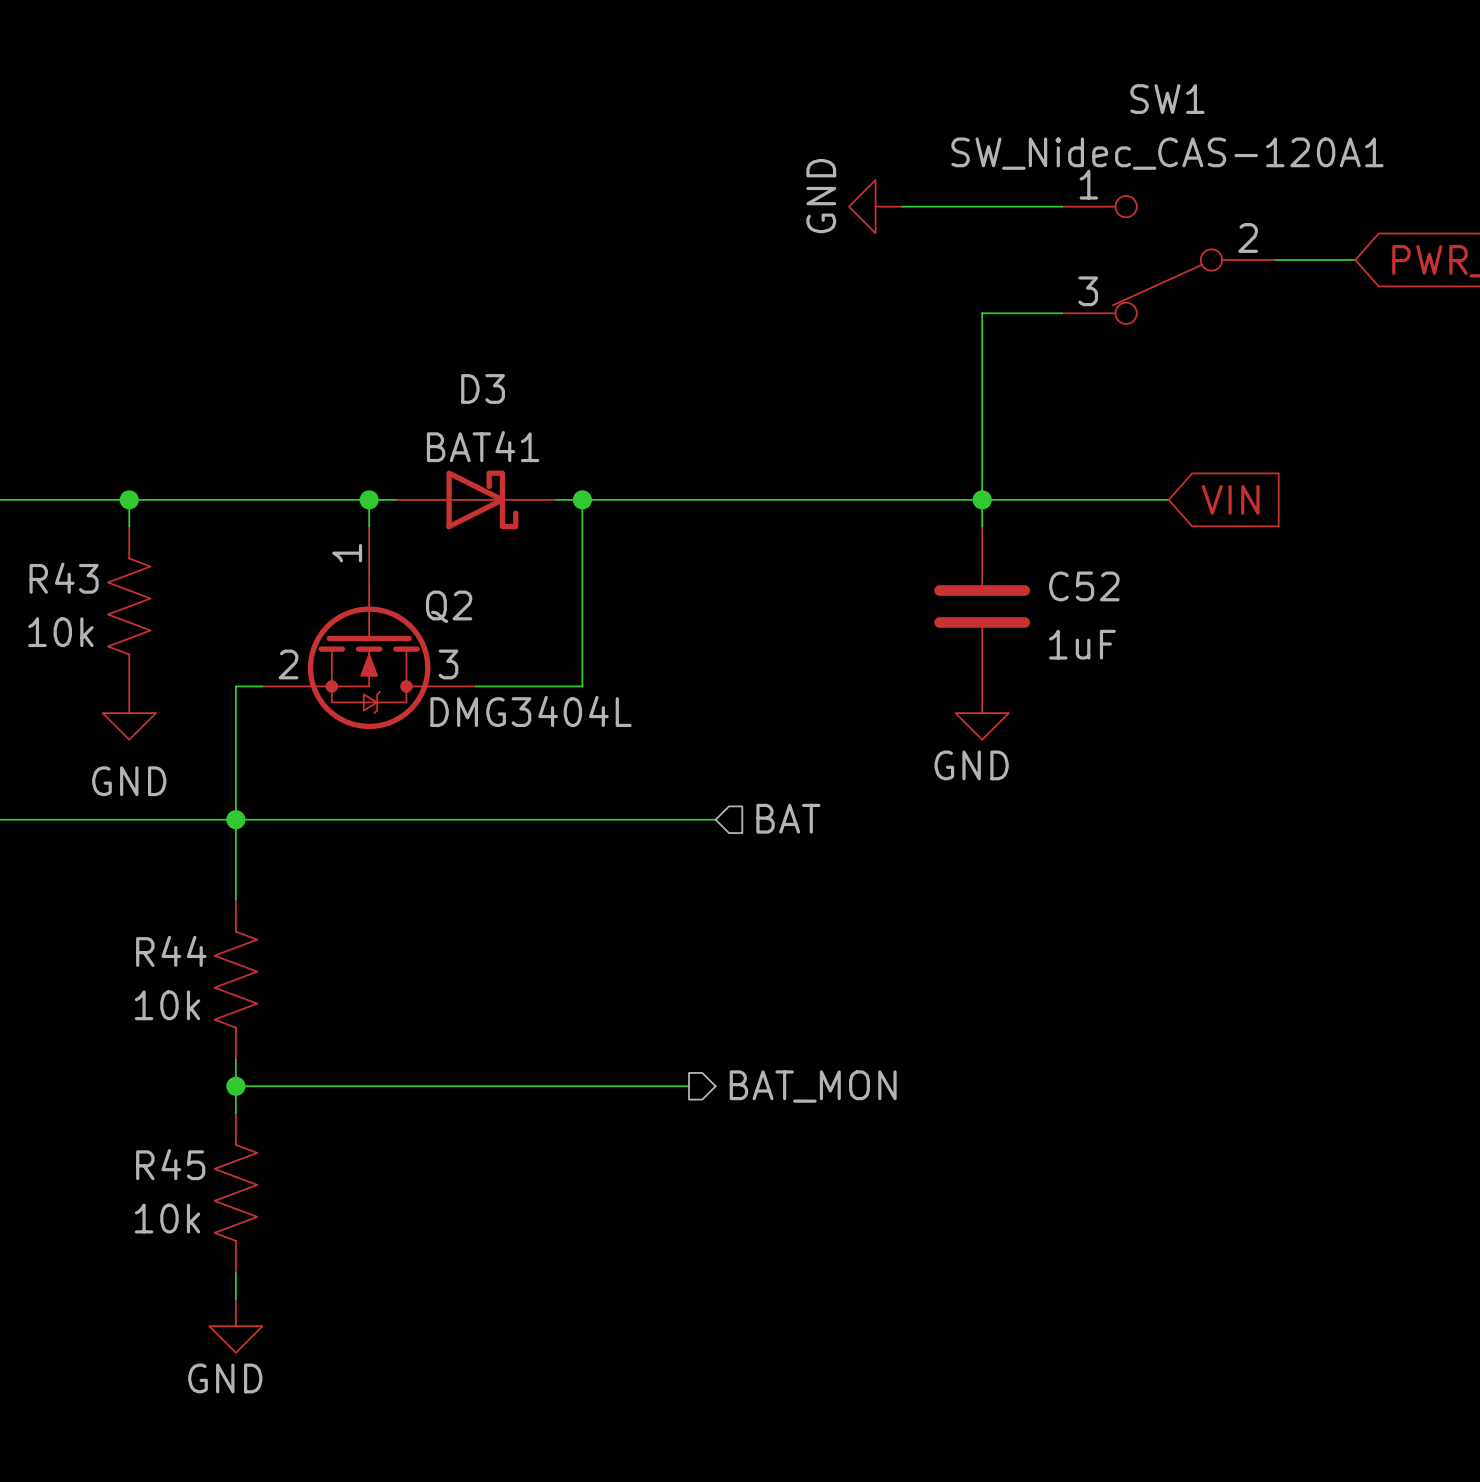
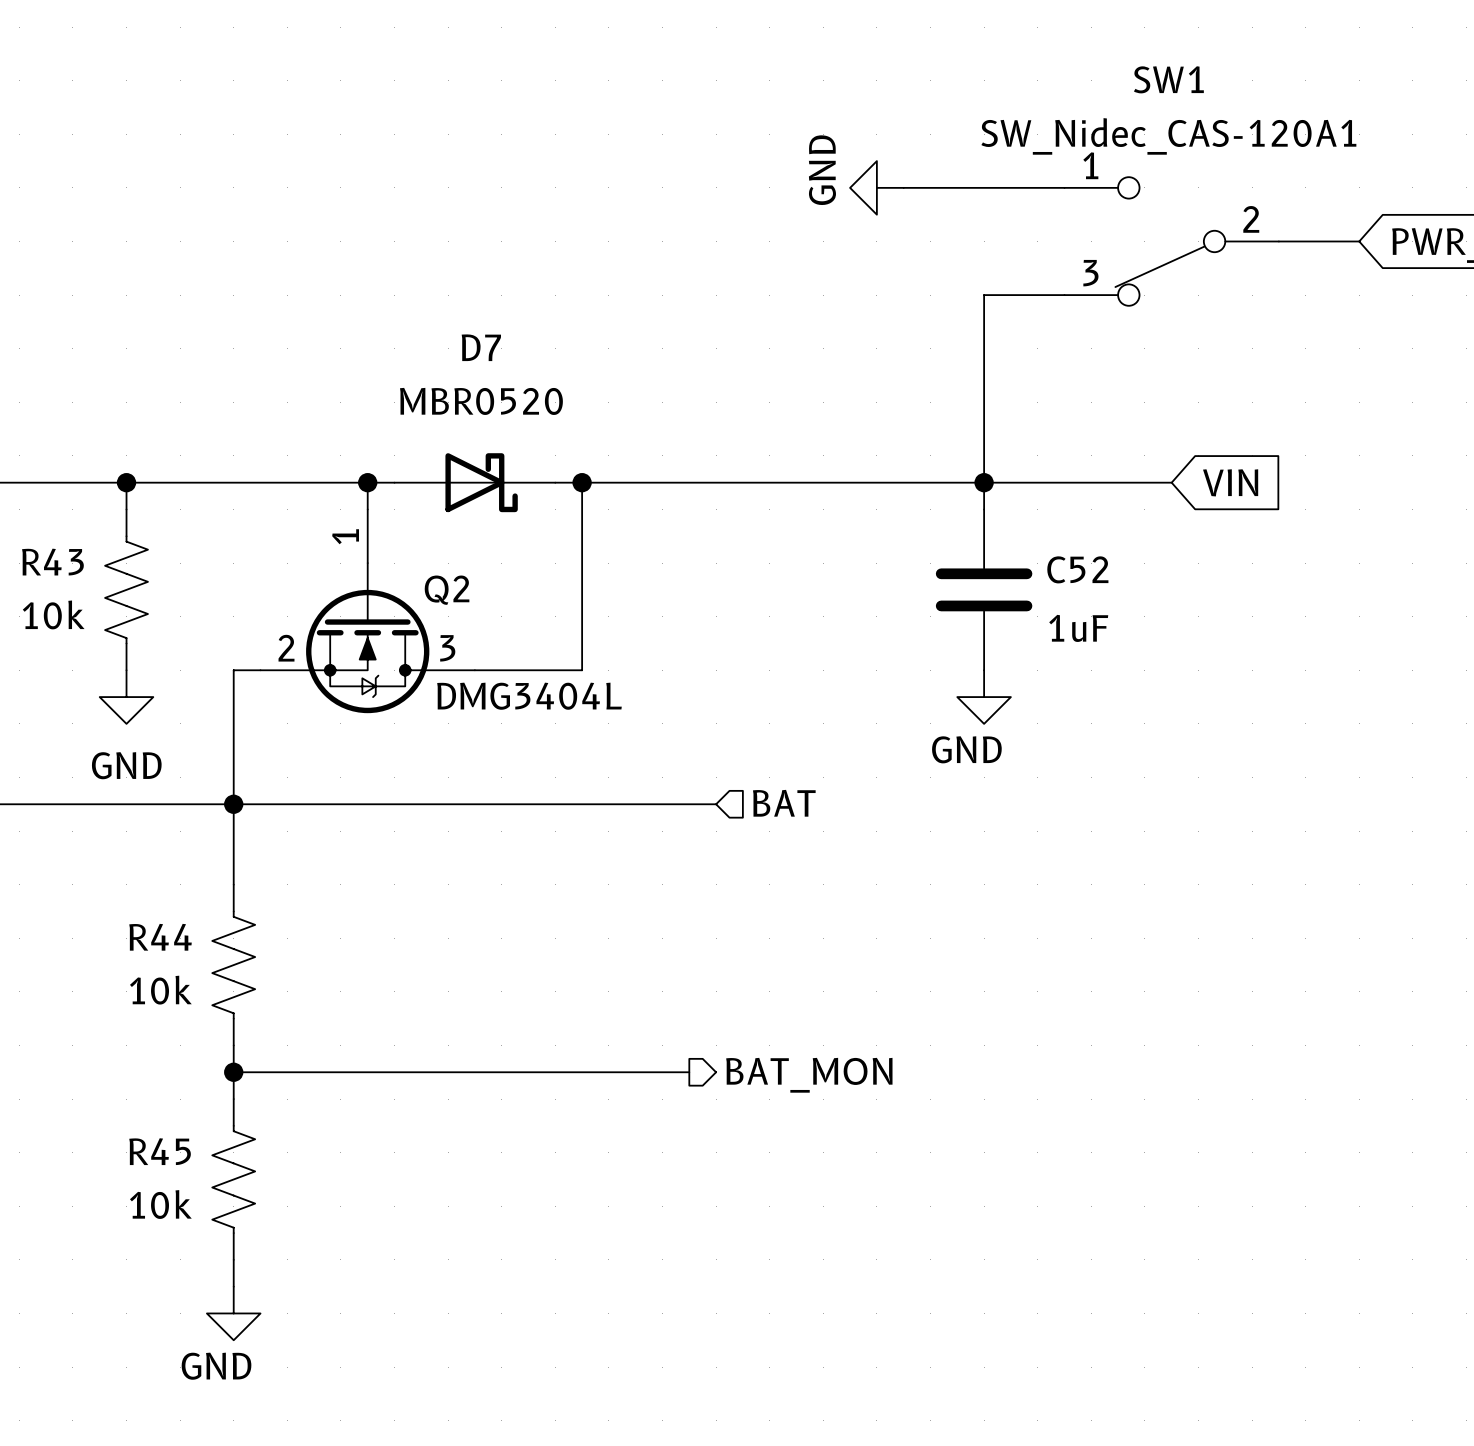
D3 name: D3 (483, 388) -> D7 (481, 347)
D3 value: BAT41 (483, 446) -> MBR0520 (481, 401)

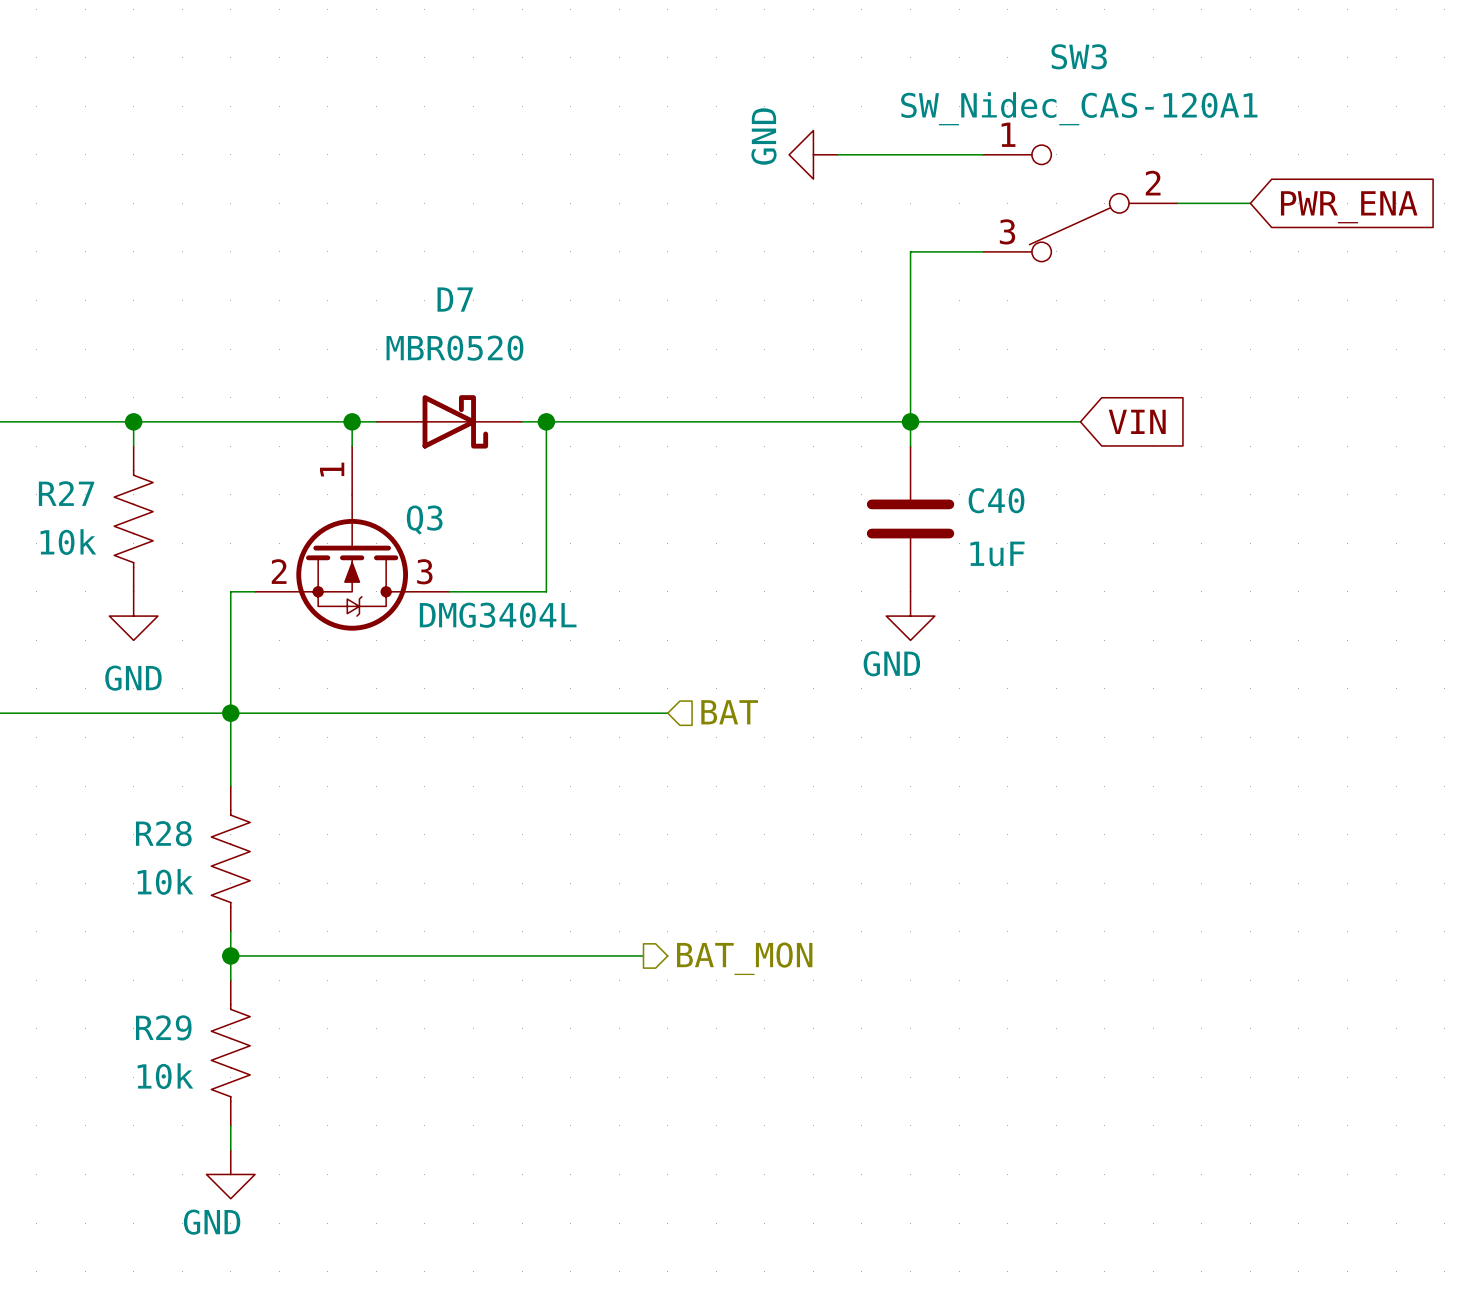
SW1 name: SW1 (1168, 79) -> SW3 (1079, 56)
R43 name: R43 (52, 562) -> R27 (66, 493)
C52 name: C52 (1077, 569) -> C40 (996, 500)
Q2 name: Q2 (447, 590) -> Q3 (424, 520)
R44 name: R44 (160, 937) -> R28 (163, 833)
R45 name: R45 (160, 1151) -> R29 (163, 1027)

